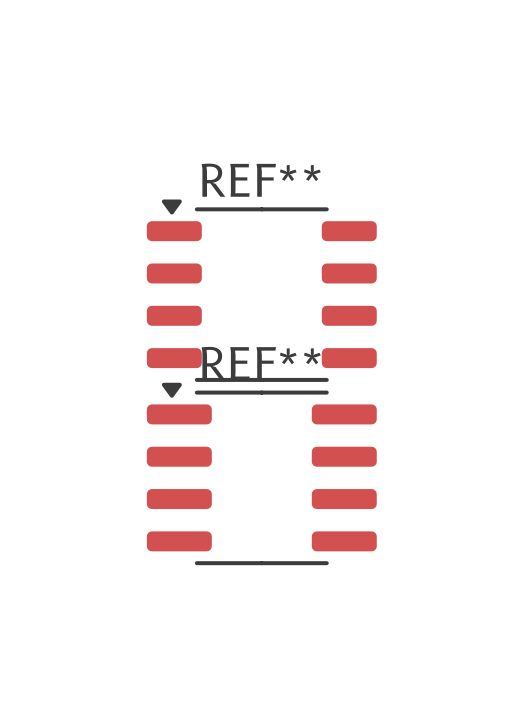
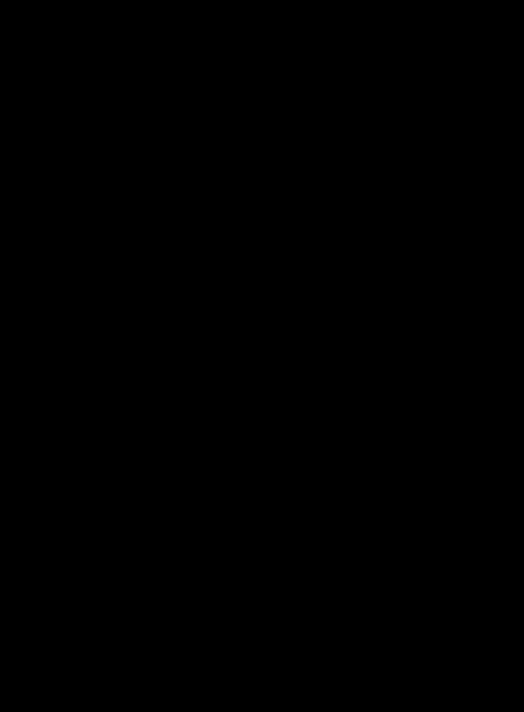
REF**: (261, 290) -> none
REF**: (261, 473) -> none

